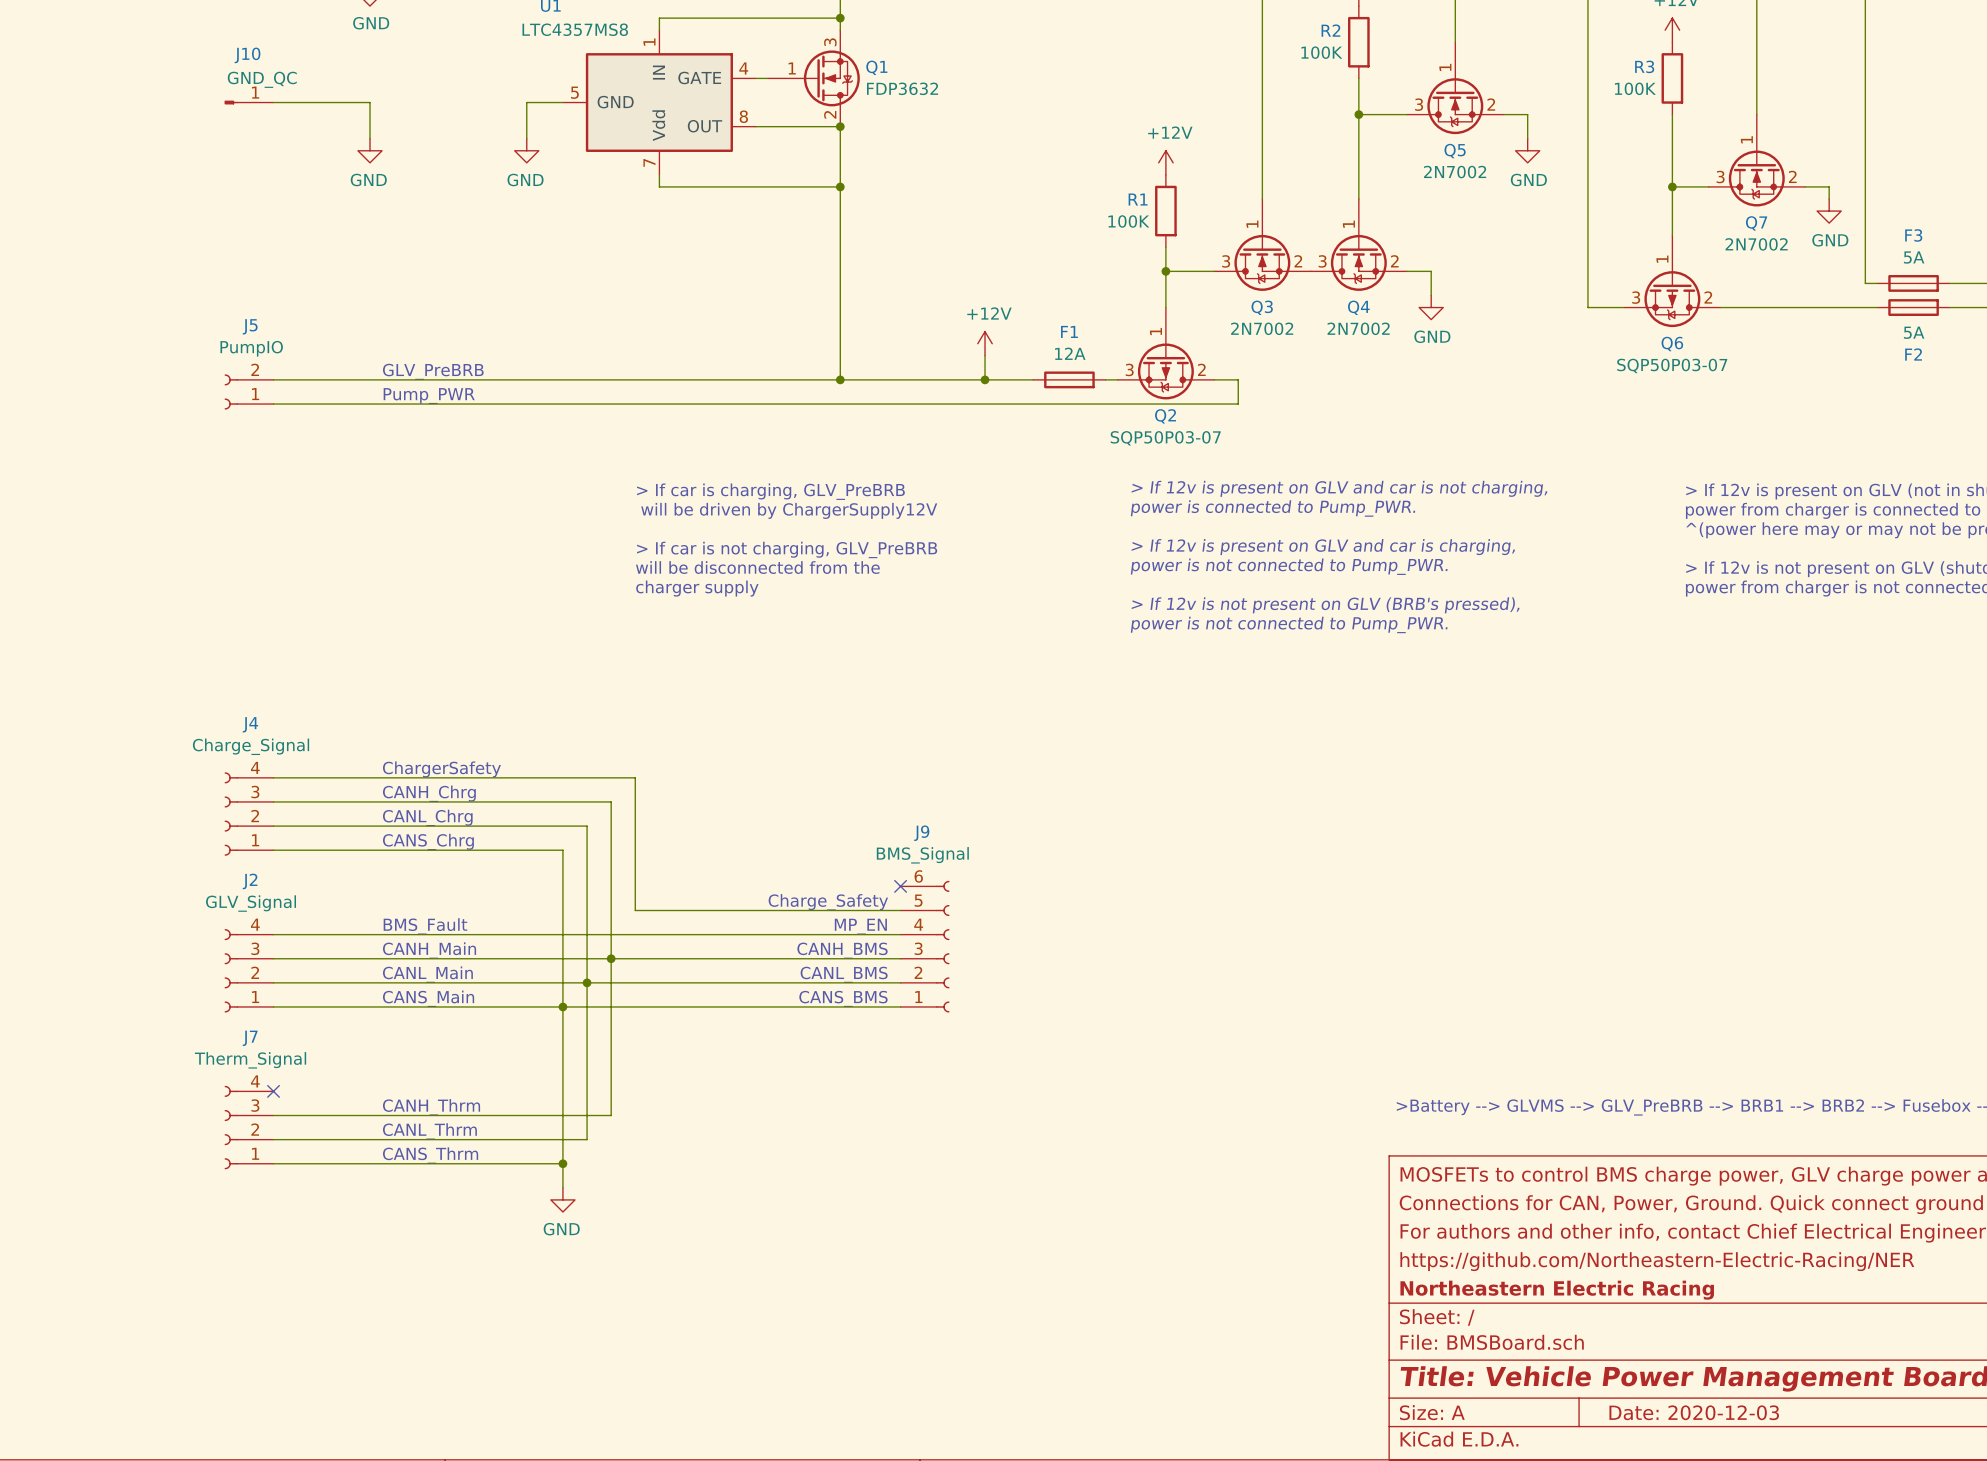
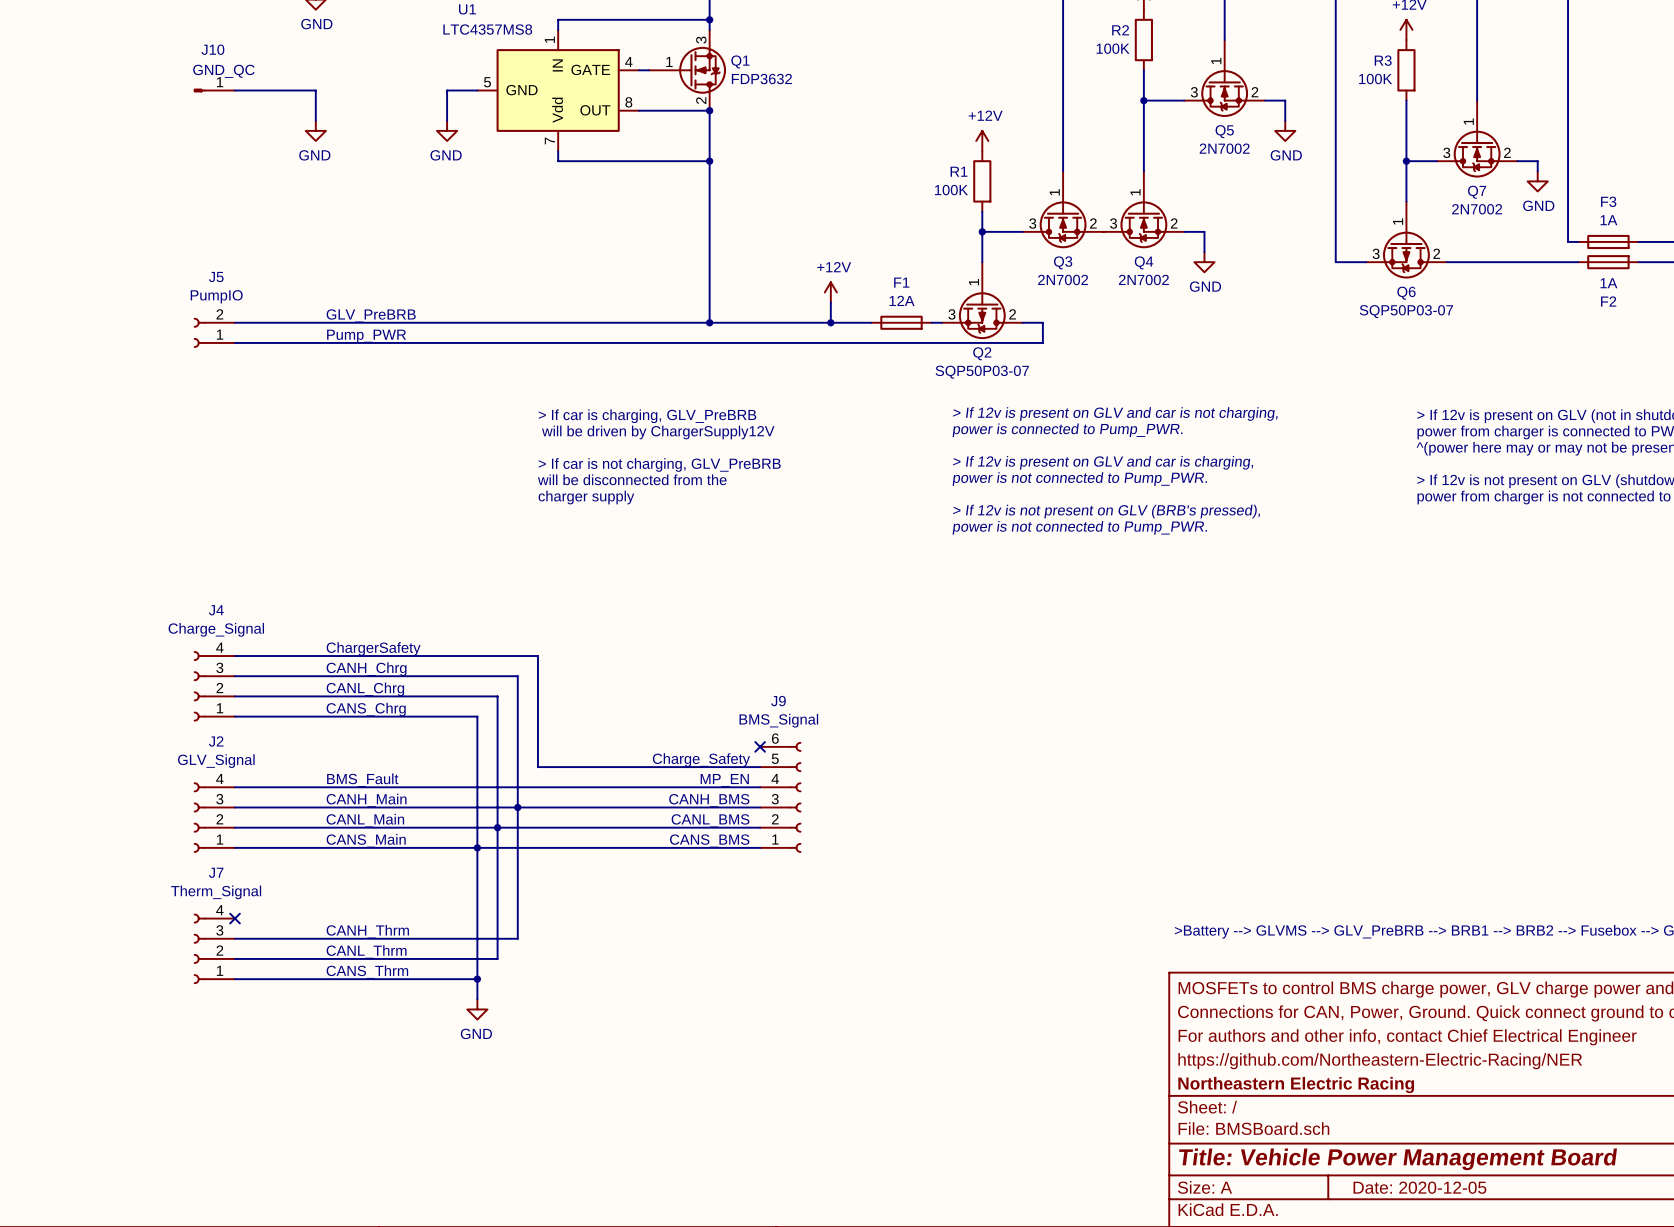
F3 value: 5A (1914, 257) -> 1A (1608, 220)
F2 value: 5A (1914, 332) -> 1A (1608, 283)
title block: Date: 2020-12-03 (1694, 1412) -> Date: 2020-12-05 (1419, 1187)

